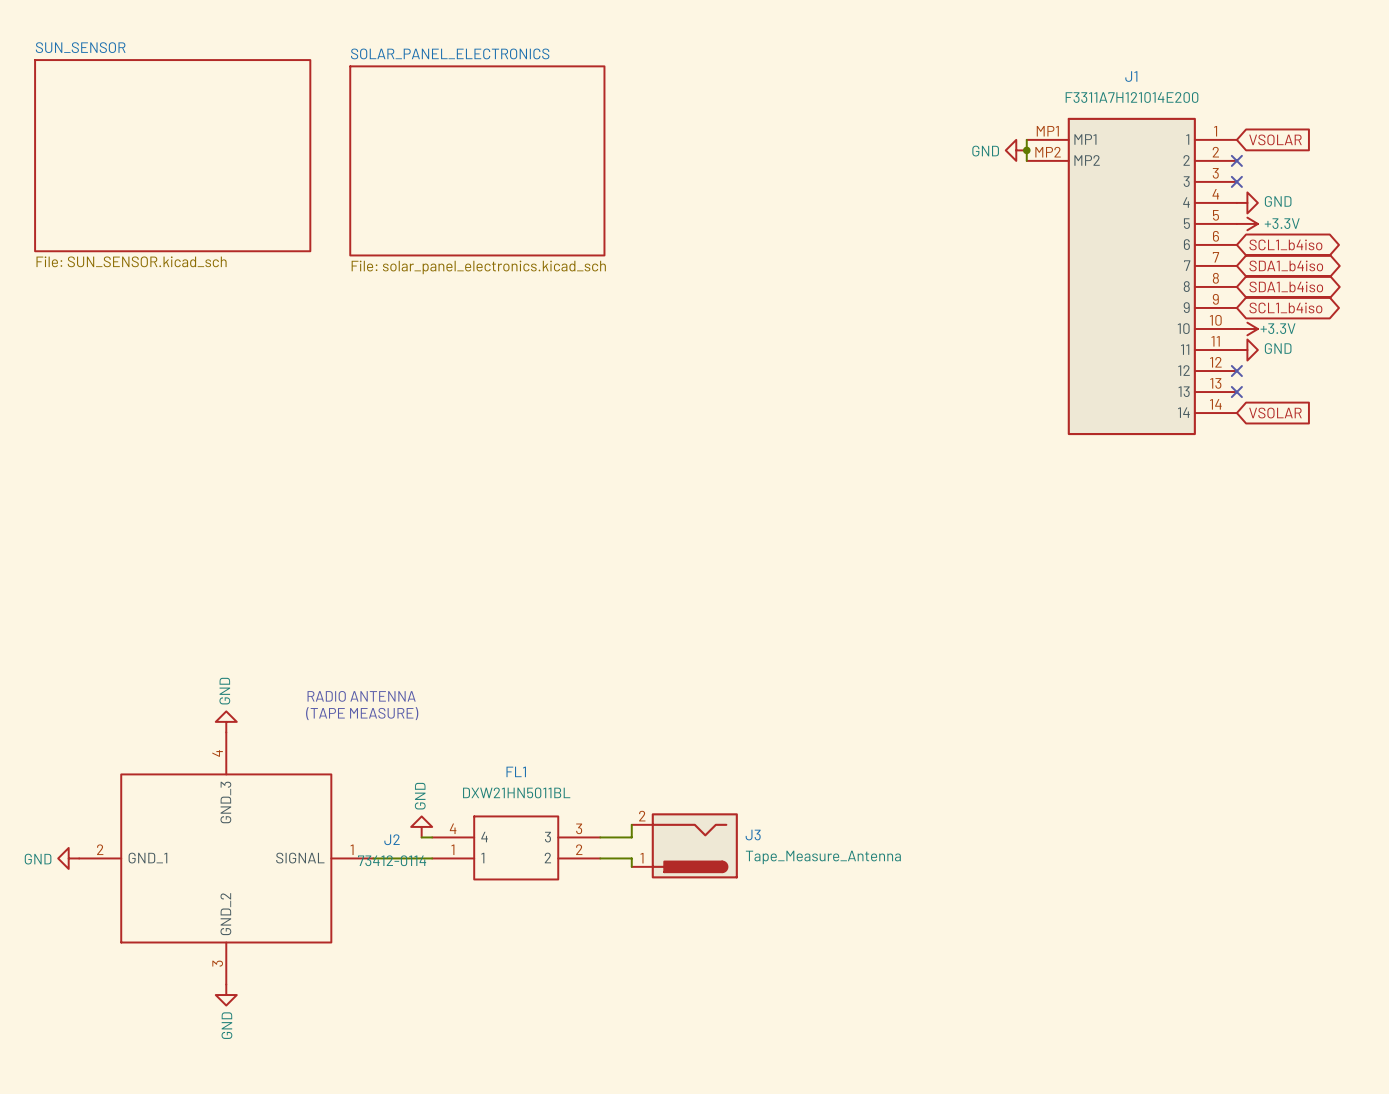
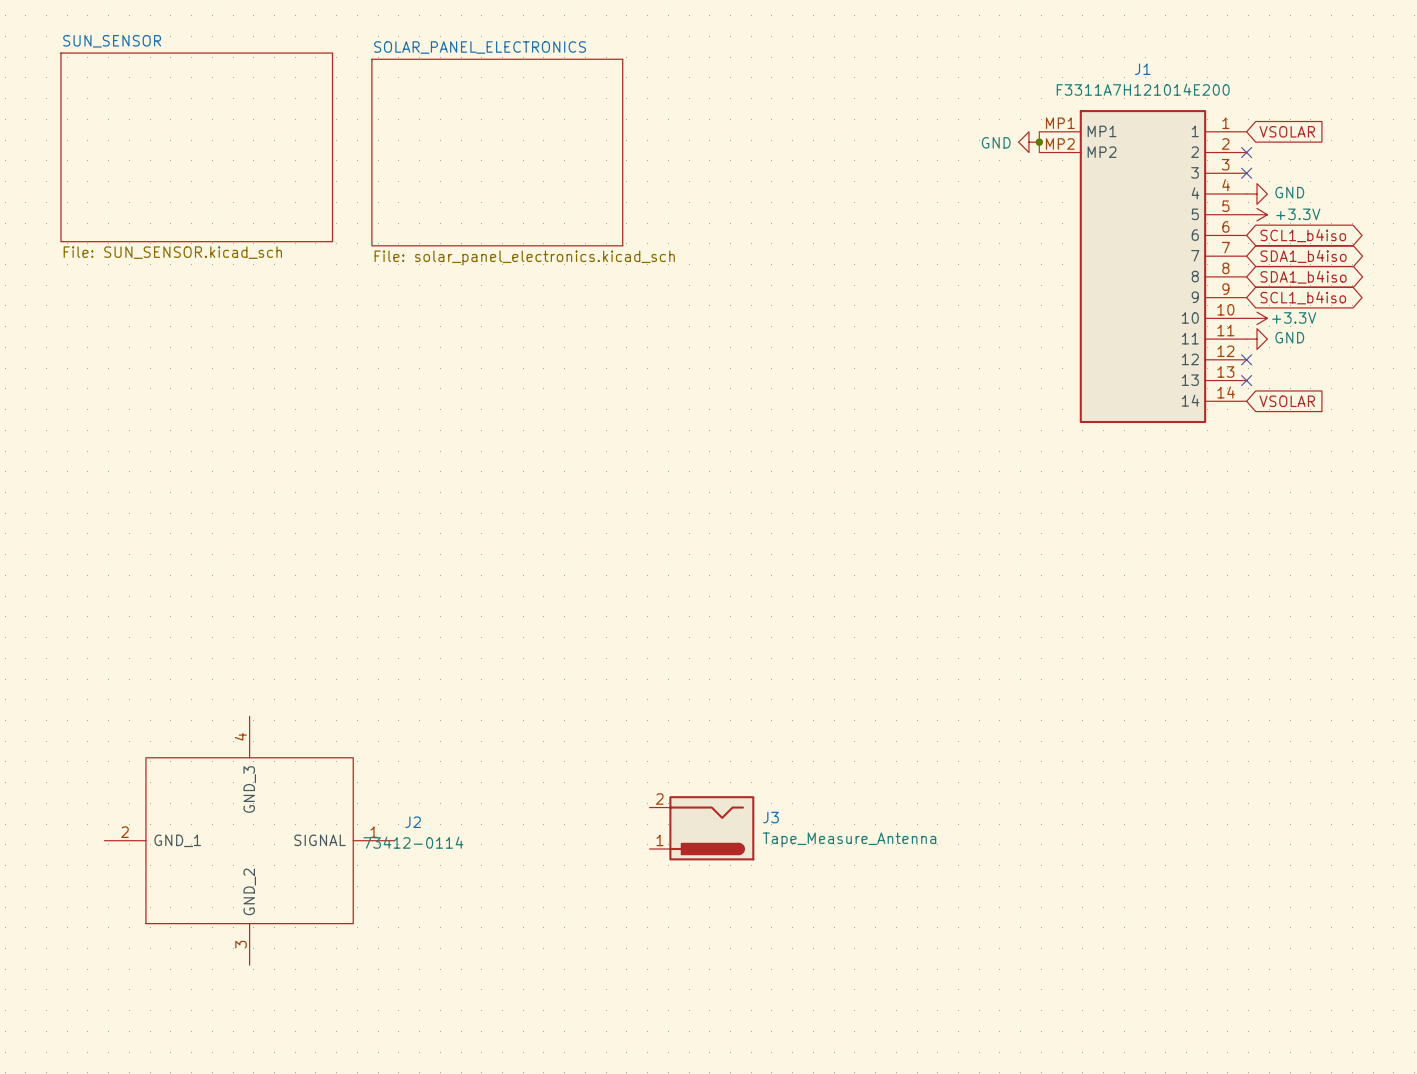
text: RADIO ANTENNA (361, 696) -> none
text: (TAPE MEASURE) (362, 713) -> none
power symbol: GND (226, 721) -> none
wire: (631, 824) (631, 837) (600, 837) -> none
power symbol: GND (421, 826) -> none
wire: (421, 837) (432, 837) -> none
FL1: DXW21HN5011BL (516, 847) -> none
power symbol: GND (68, 858) -> none
wire: (373, 858) (432, 858) -> none
wire: (600, 858) (631, 858) (631, 866) -> none
power symbol: GND (226, 995) -> none

